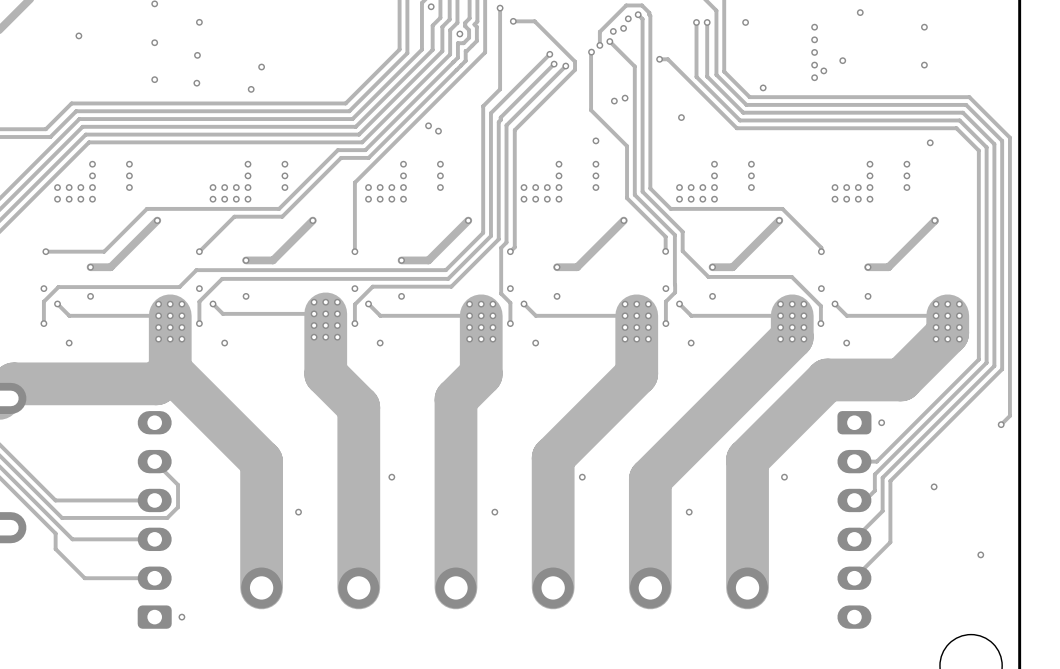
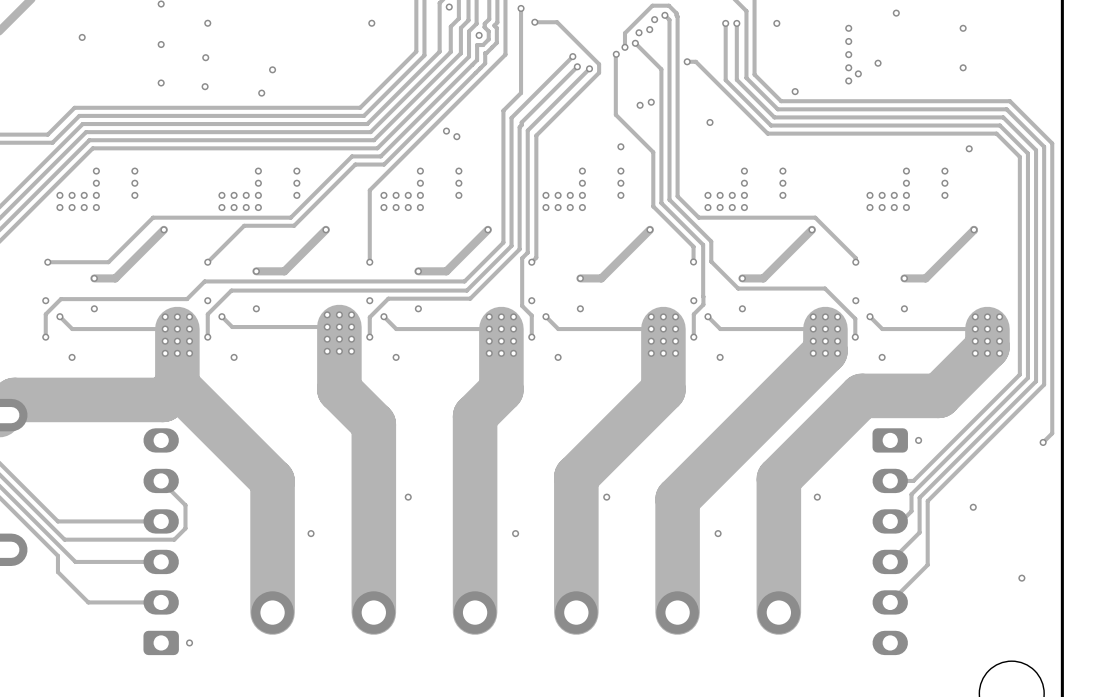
via: none -> (371, 23)

